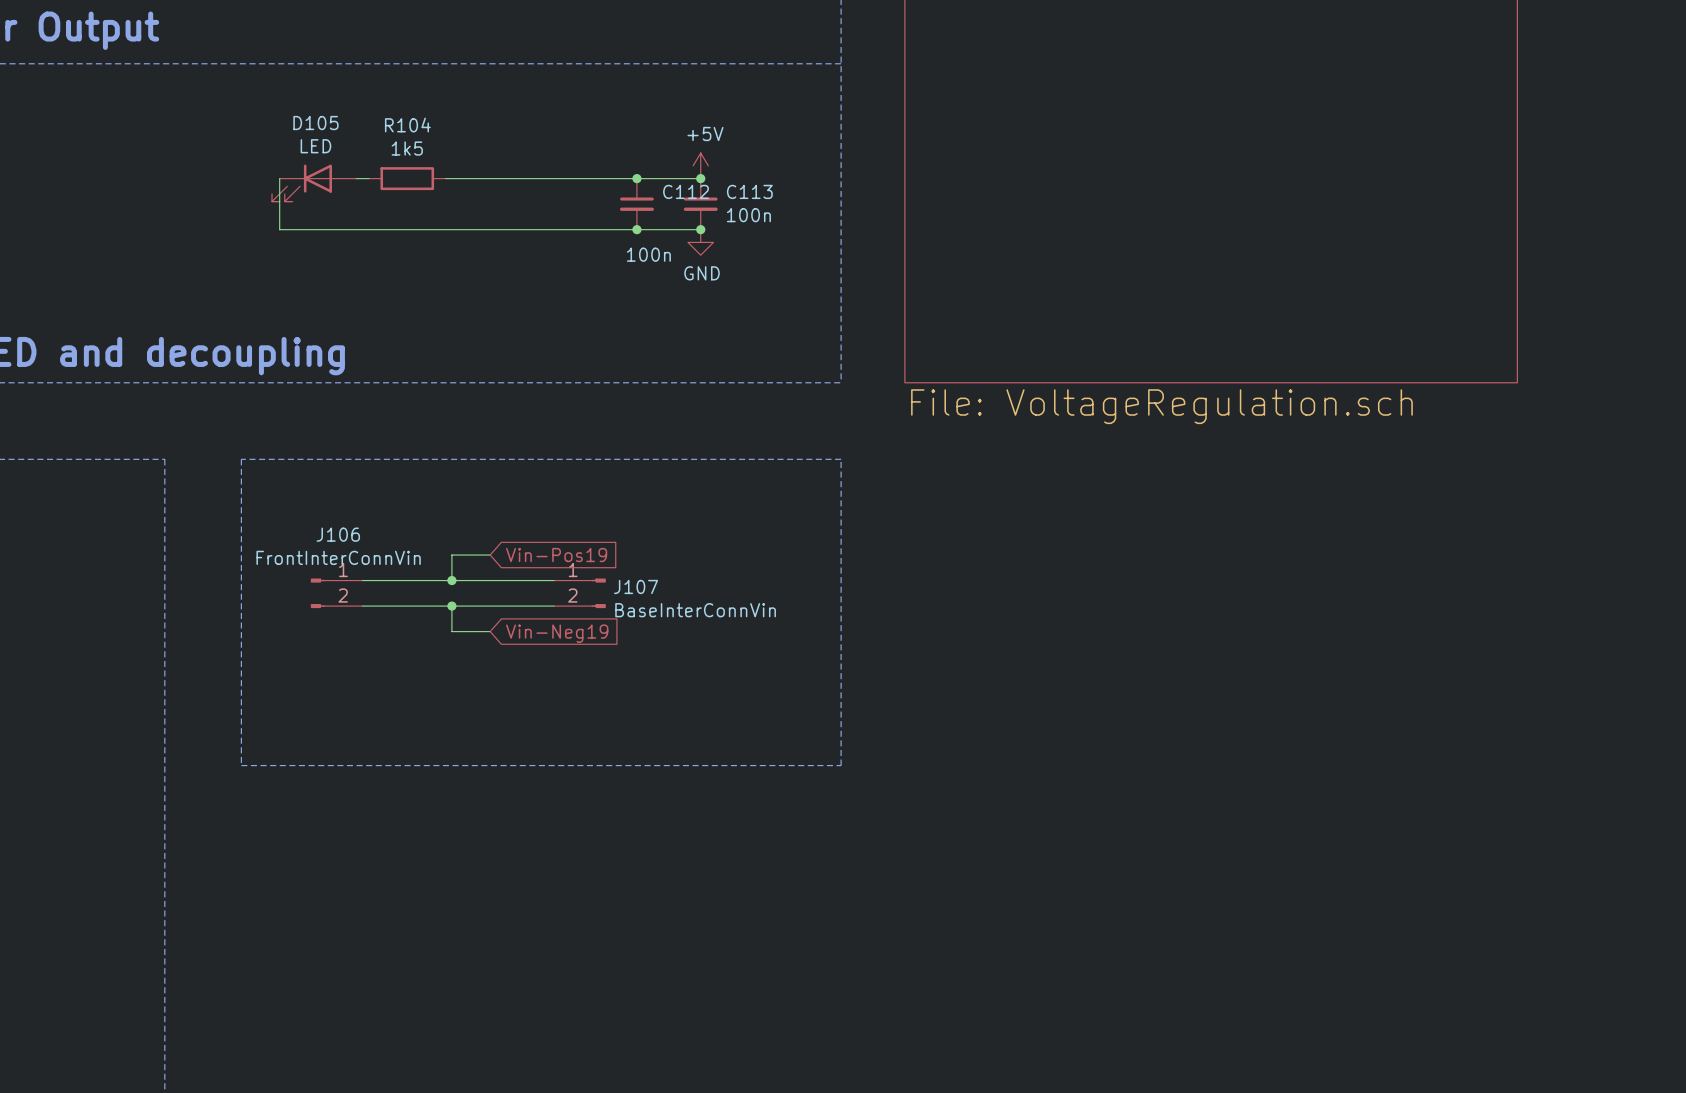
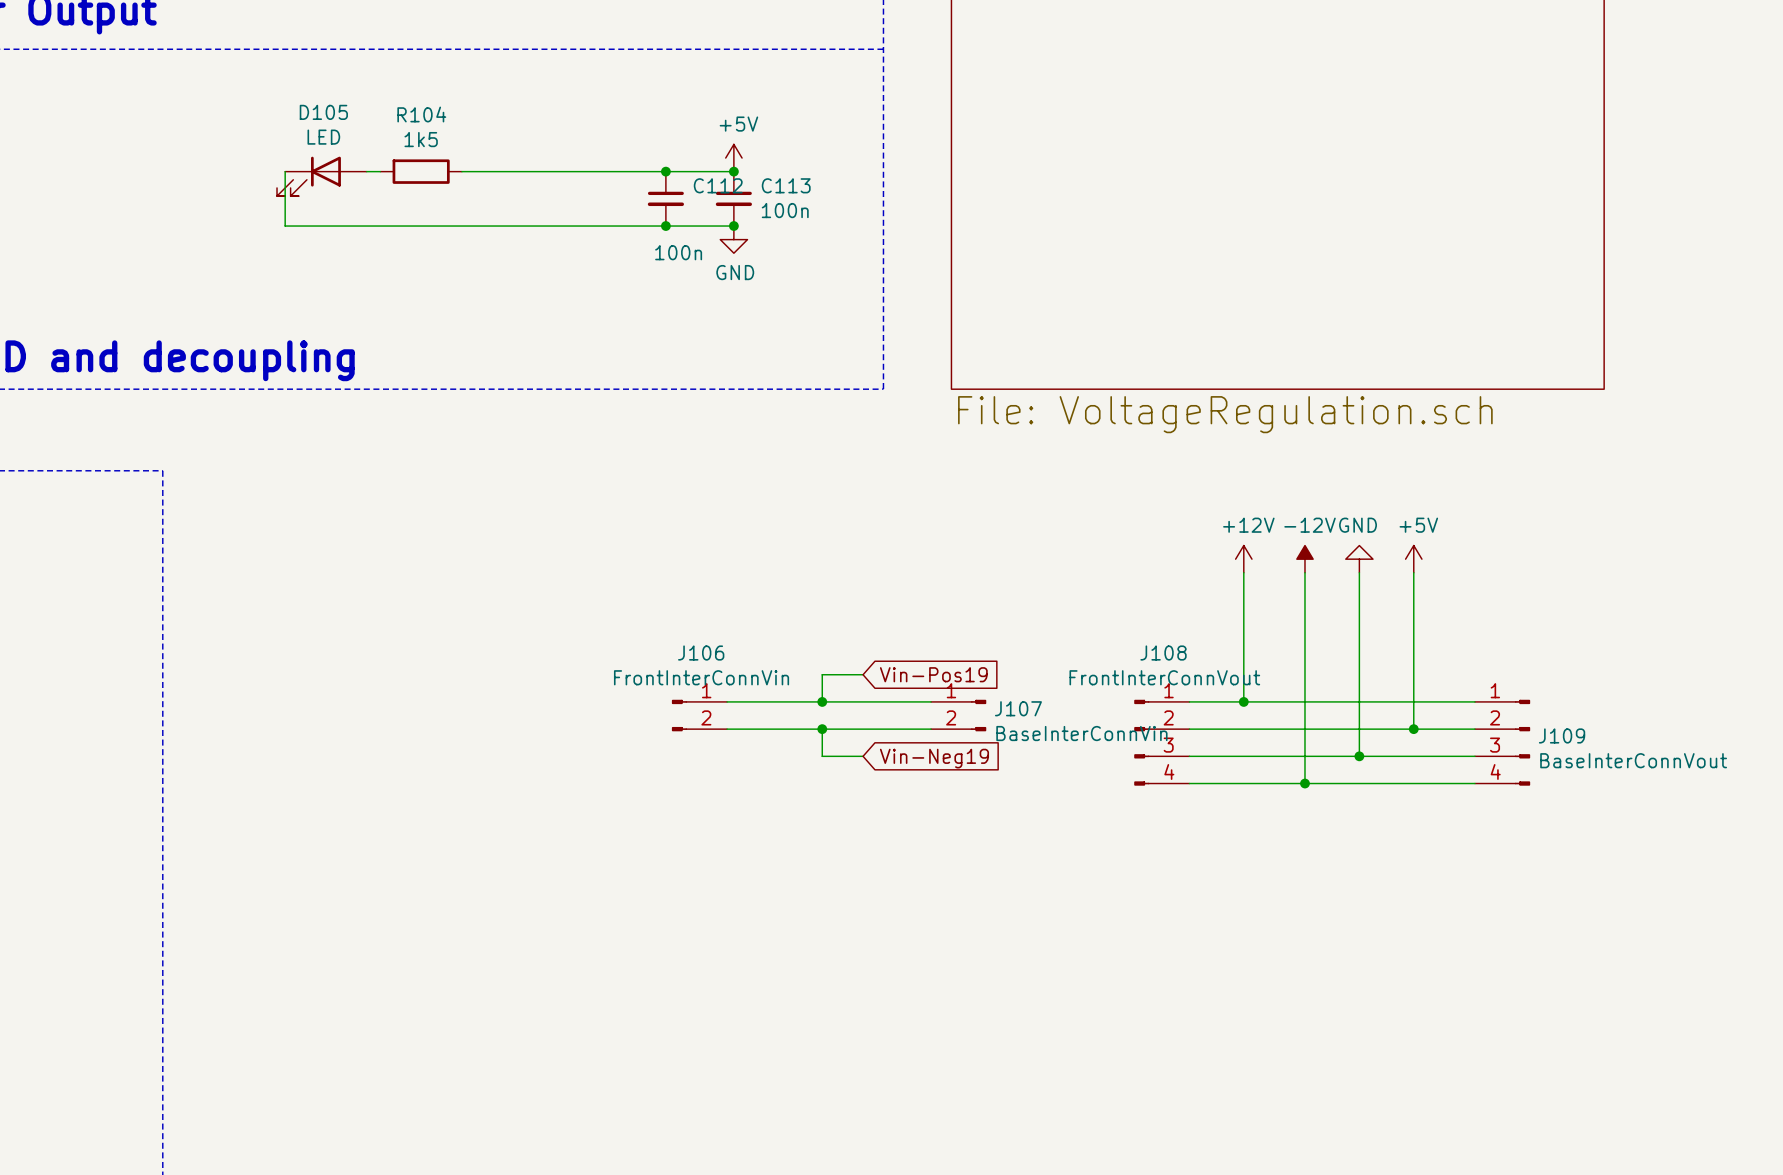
line: (241, 459) (241, 765) (841, 765) (841, 459) (241, 459) -> none
power symbol: none -> +12V (1243, 559)
power symbol: none -> -12V (1304, 559)
power symbol: none -> GND (1359, 559)
power symbol: none -> +5V (1413, 559)
wire: (490, 555) (451, 555) (451, 580) -> none
global label: Vin-Pos19 (556, 555) -> none
wire: none -> (1243, 572) (1243, 701)
wire: none -> (1304, 572) (1304, 783)
wire: none -> (1359, 572) (1359, 756)
wire: none -> (1413, 572) (1413, 729)
wire: (362, 580) (554, 580) -> none
junction: (451, 580) -> none
J106 position: (336, 593) -> (699, 715)
J107 position: (579, 593) -> (958, 715)
wire: (362, 606) (554, 606) -> none
wire: (451, 606) (451, 631) (490, 631) -> none
junction: (451, 606) -> none
global label: Vin-Neg19 (557, 633) -> none
wire: none -> (863, 674) (822, 674) (822, 701)
global label: none -> Vin-Pos19 (933, 674)
wire: none -> (727, 701) (931, 701)
junction: none -> (822, 701)
wire: none -> (1189, 701) (1474, 701)
junction: none -> (1243, 701)
wire: none -> (727, 729) (931, 729)
wire: none -> (822, 729) (822, 756) (863, 756)
junction: none -> (822, 729)
wire: none -> (1189, 729) (1474, 729)
junction: none -> (1413, 729)
J108: none -> FrontInterConnVout (1161, 742)
J109: none -> BaseInterConnVout (1502, 742)
wire: none -> (1189, 756) (1474, 756)
junction: none -> (1359, 756)
global label: none -> Vin-Neg19 (934, 758)
wire: none -> (1189, 783) (1474, 783)
junction: none -> (1304, 783)

